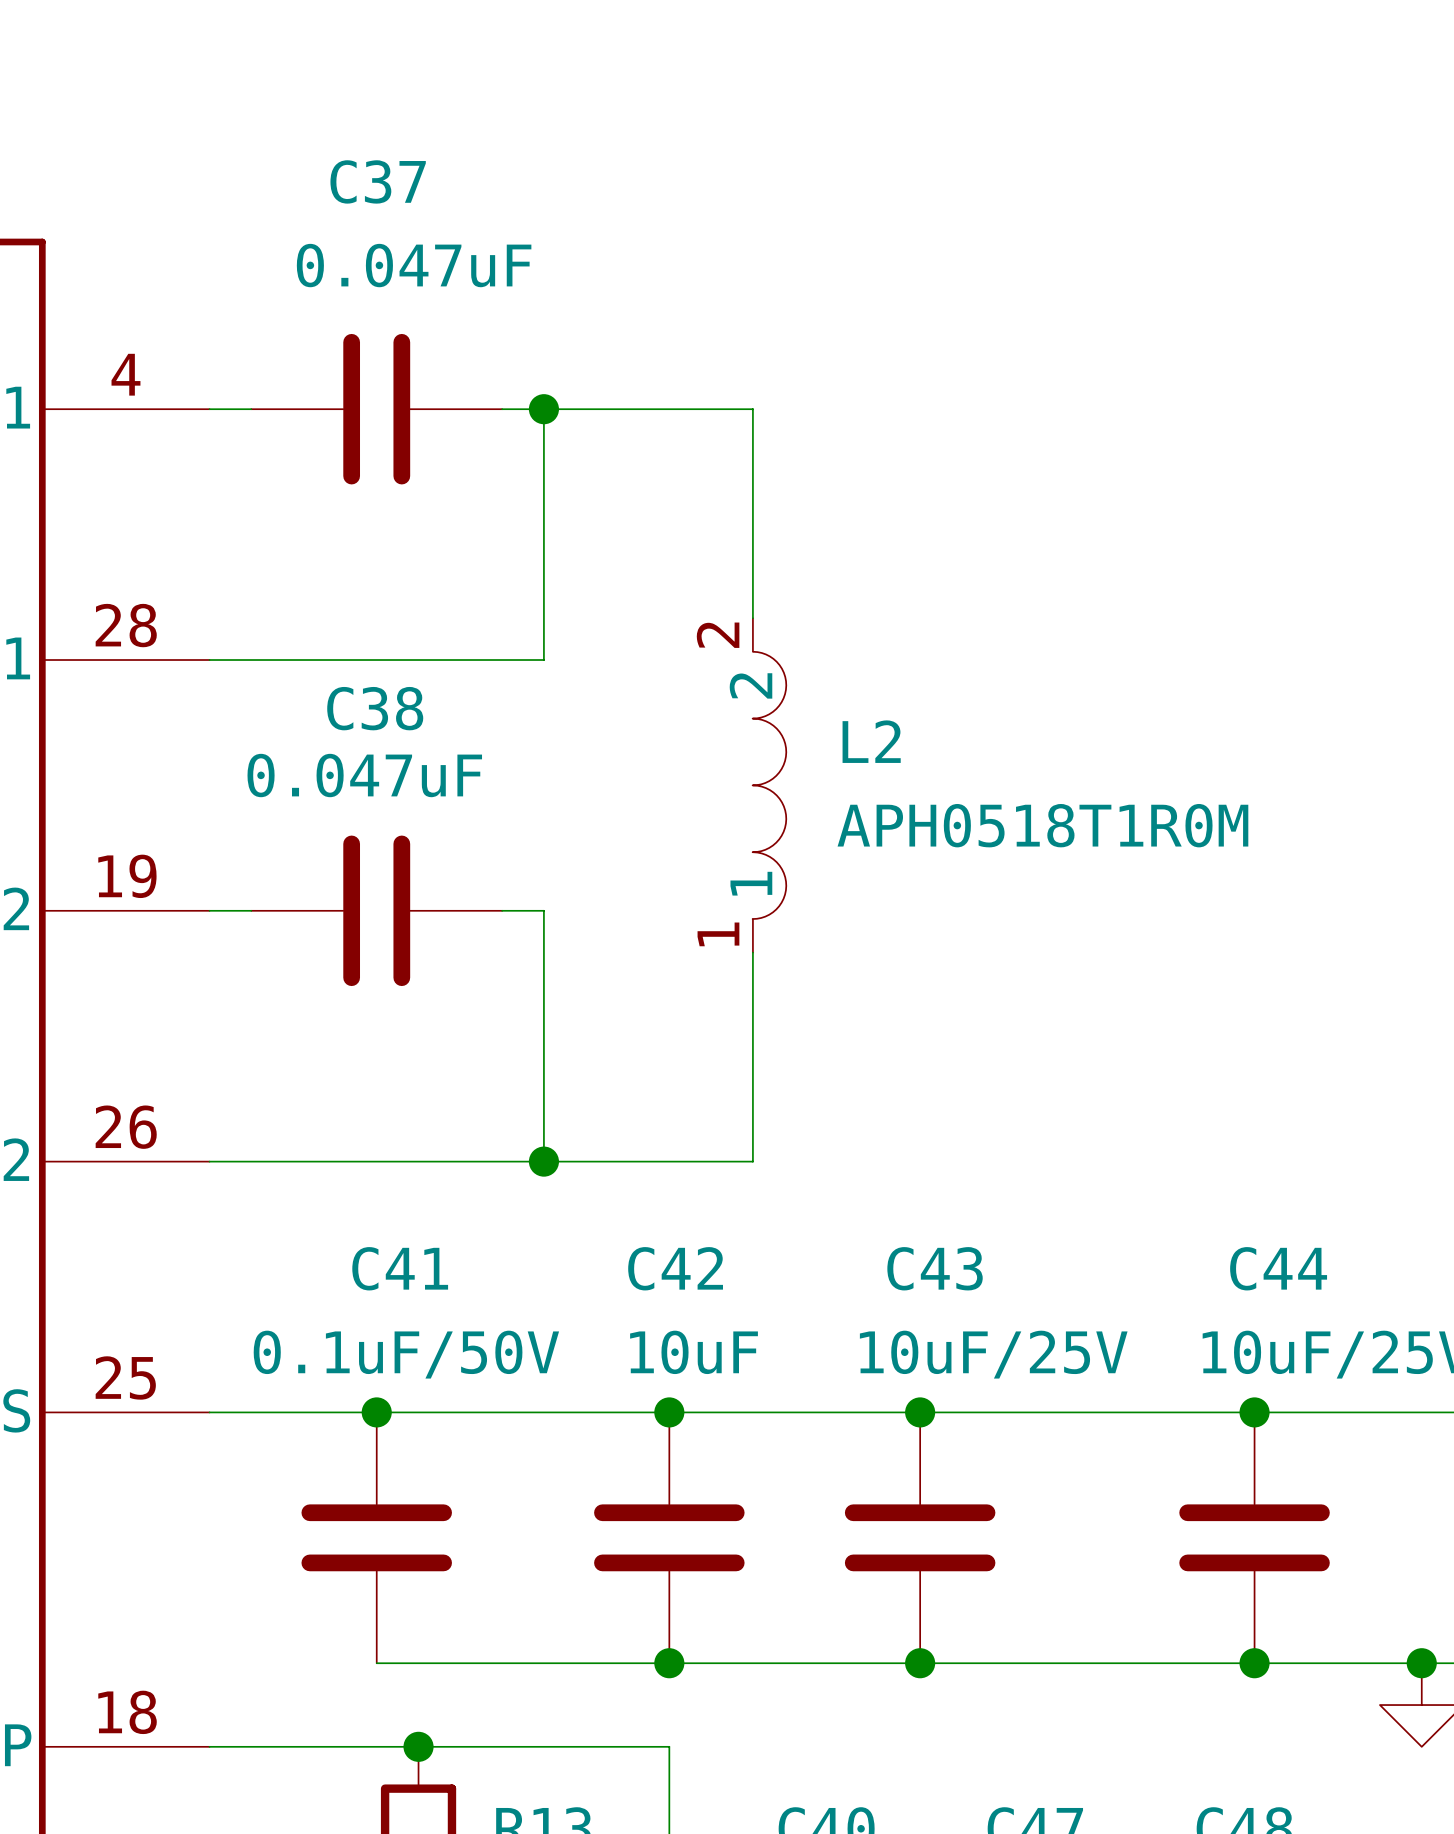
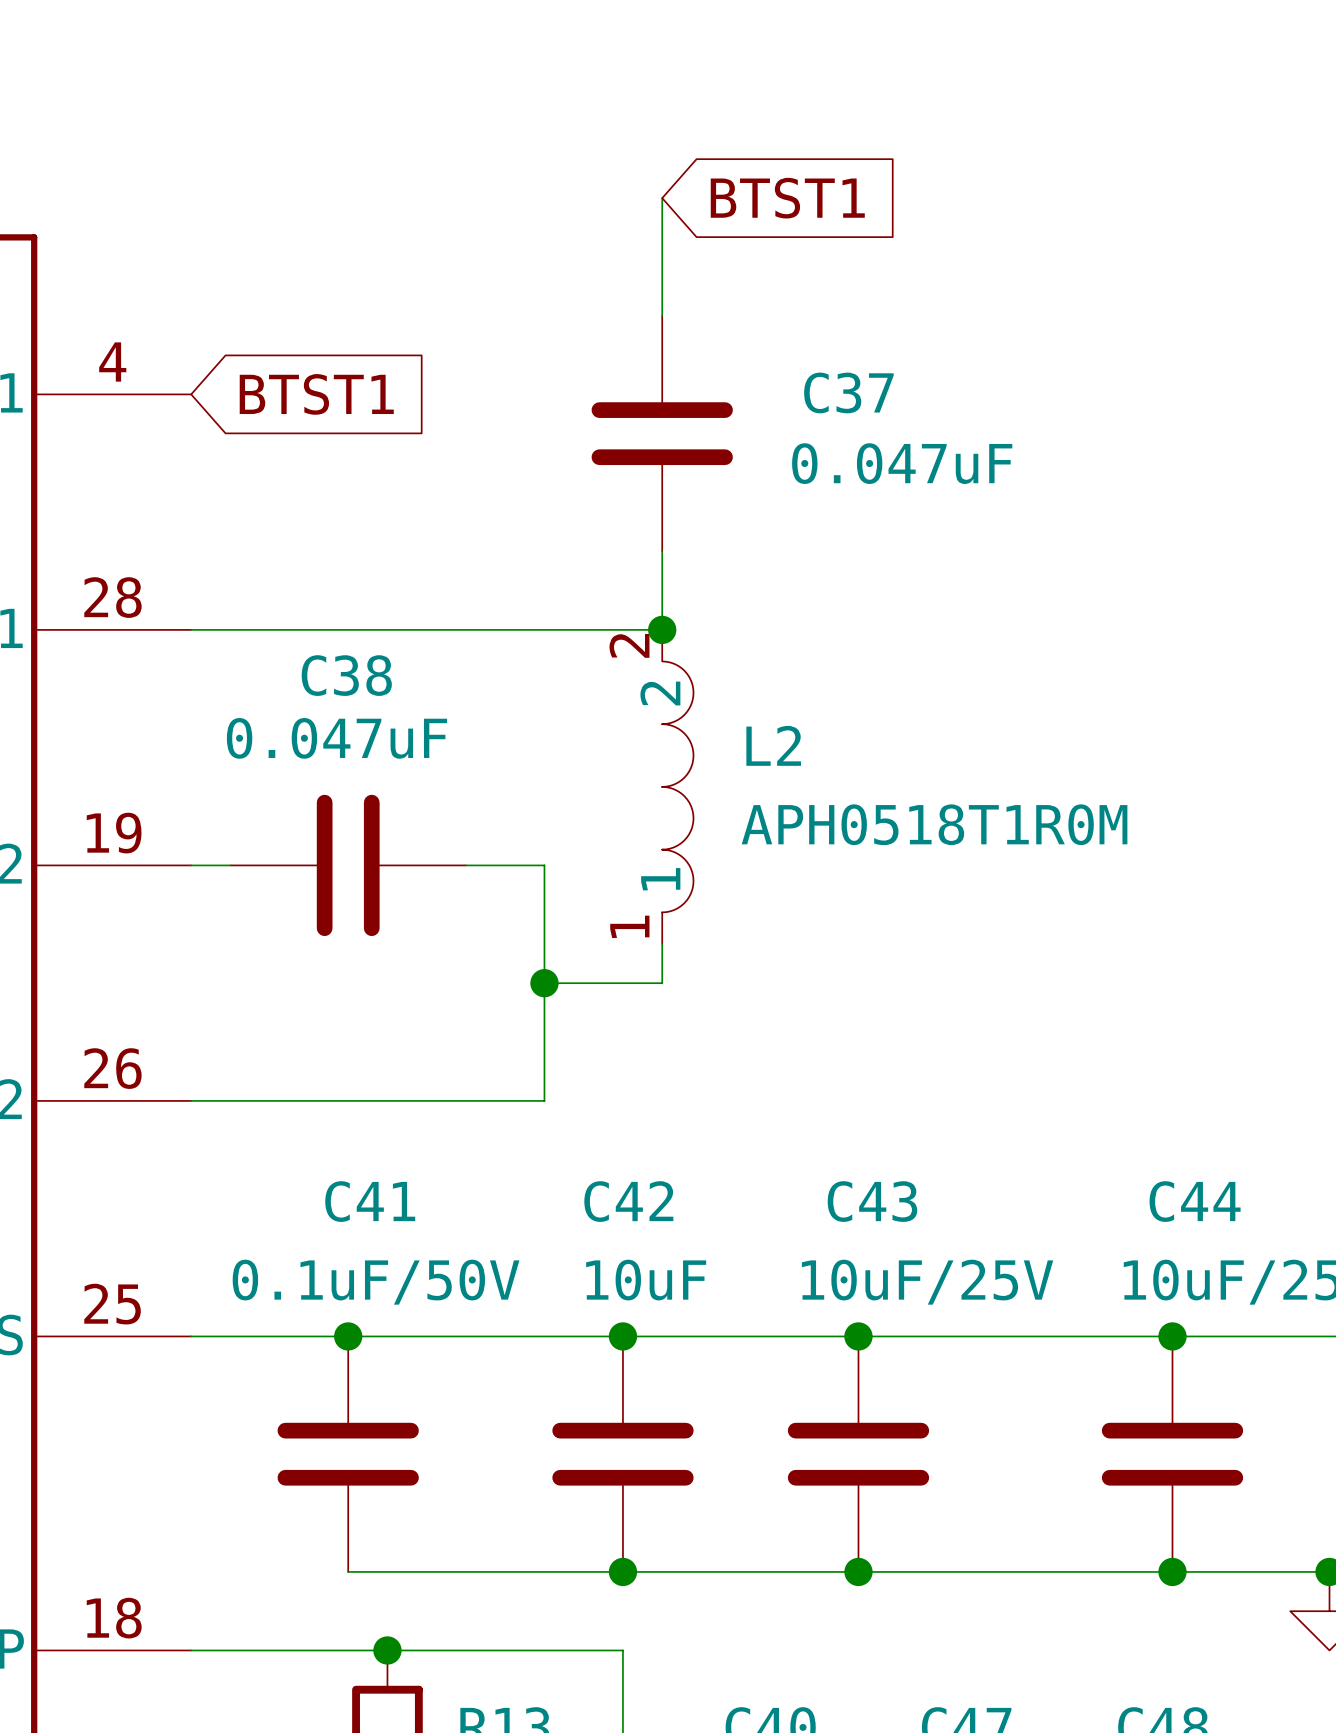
C37 name position: C37 (378, 181) -> C37 (848, 392)
wire: none -> (662, 198) (662, 315)
global label: none -> BTST1 (787, 198)
C37 value position: 0.047uF (414, 265) -> 0.047uF (902, 463)
wire: (209, 409) (251, 409) -> none
global label: none -> BTST1 (316, 394)
C37 rotation: 0° (376, 409) -> 90° clockwise (662, 433)
C37 position: (376, 409) -> (662, 433)
wire: (502, 409) (752, 409) (752, 618) -> none
wire: (543, 409) (543, 660) -> (662, 551) (662, 629) (505, 629)
junction: (543, 409) -> none
junction: none -> (662, 629)
L2 position: (769, 785) -> (677, 786)
wire: (543, 910) (543, 1161) -> (505, 865) (544, 865) (544, 1100)
wire: (752, 952) (752, 1161) (585, 1161) -> none
wire: none -> (662, 943) (662, 983) (544, 983)
junction position: (543, 1161) -> (544, 983)

